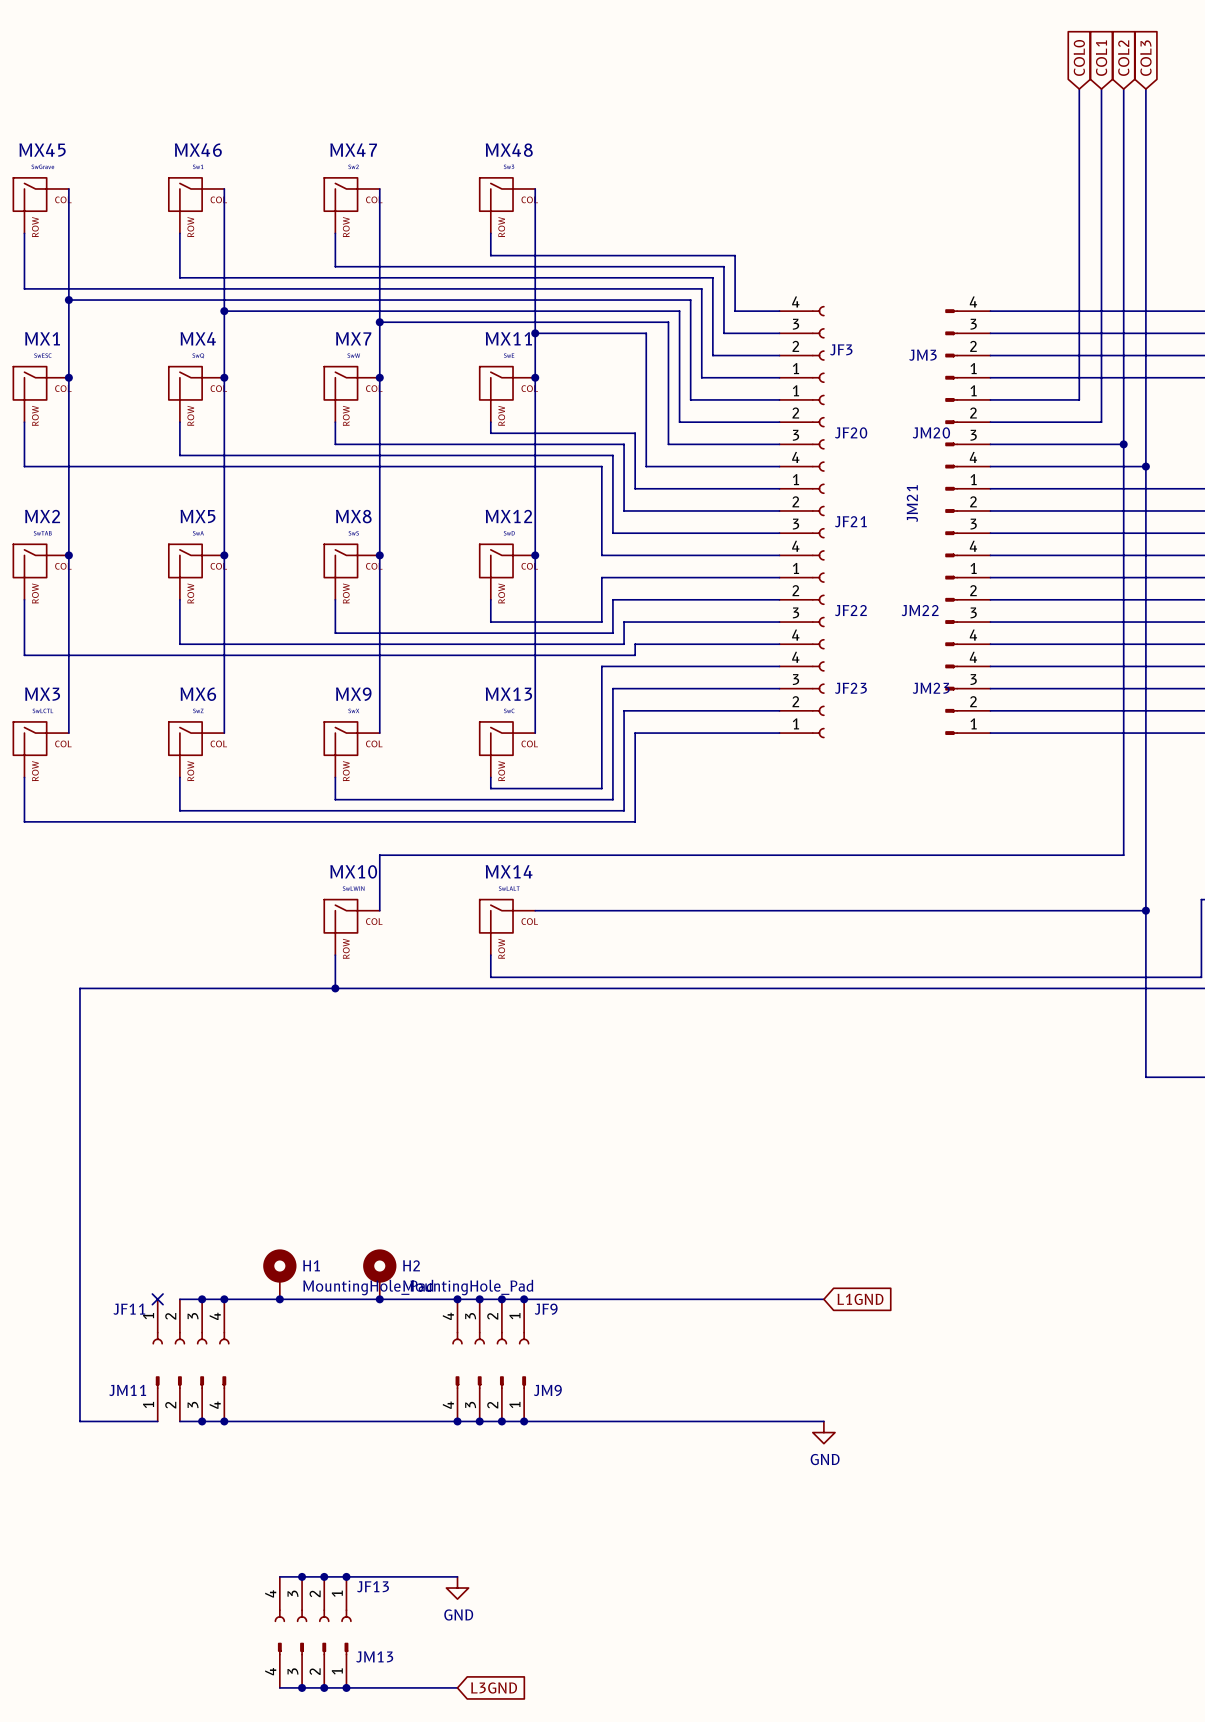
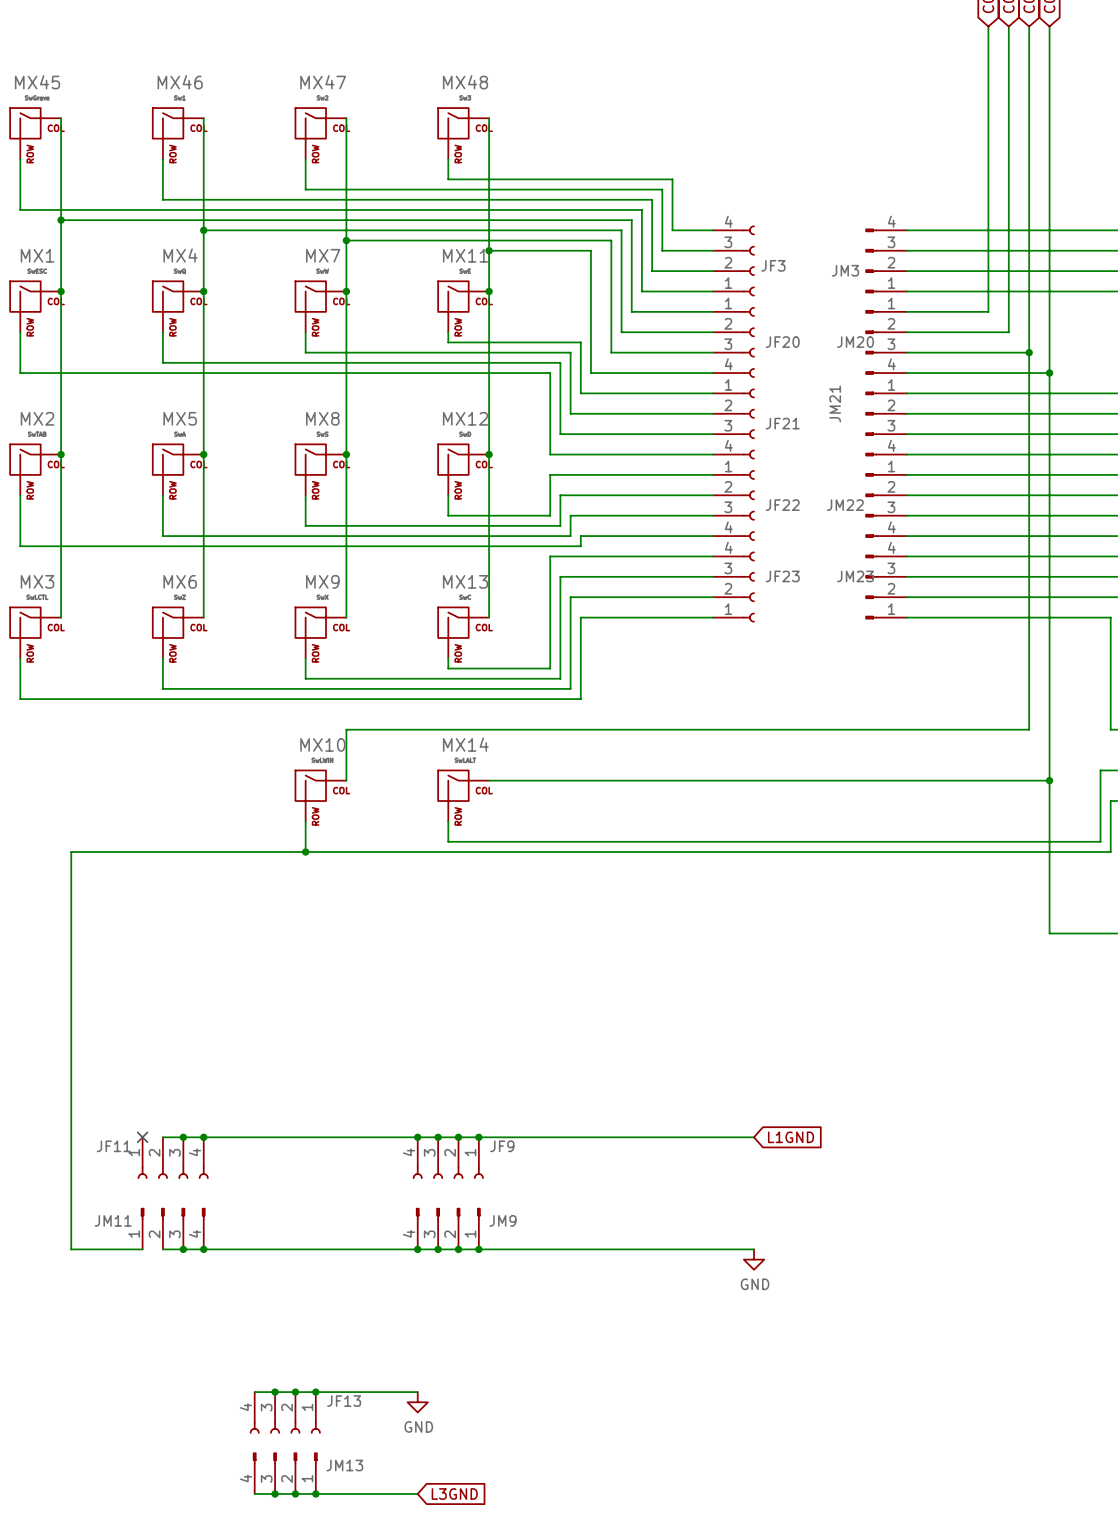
H1: MountingHole_Pad (279, 1274) -> none
H2: MountingHole_Pad (379, 1274) -> none
junction: (279, 1299) -> none
junction: (379, 1299) -> none

